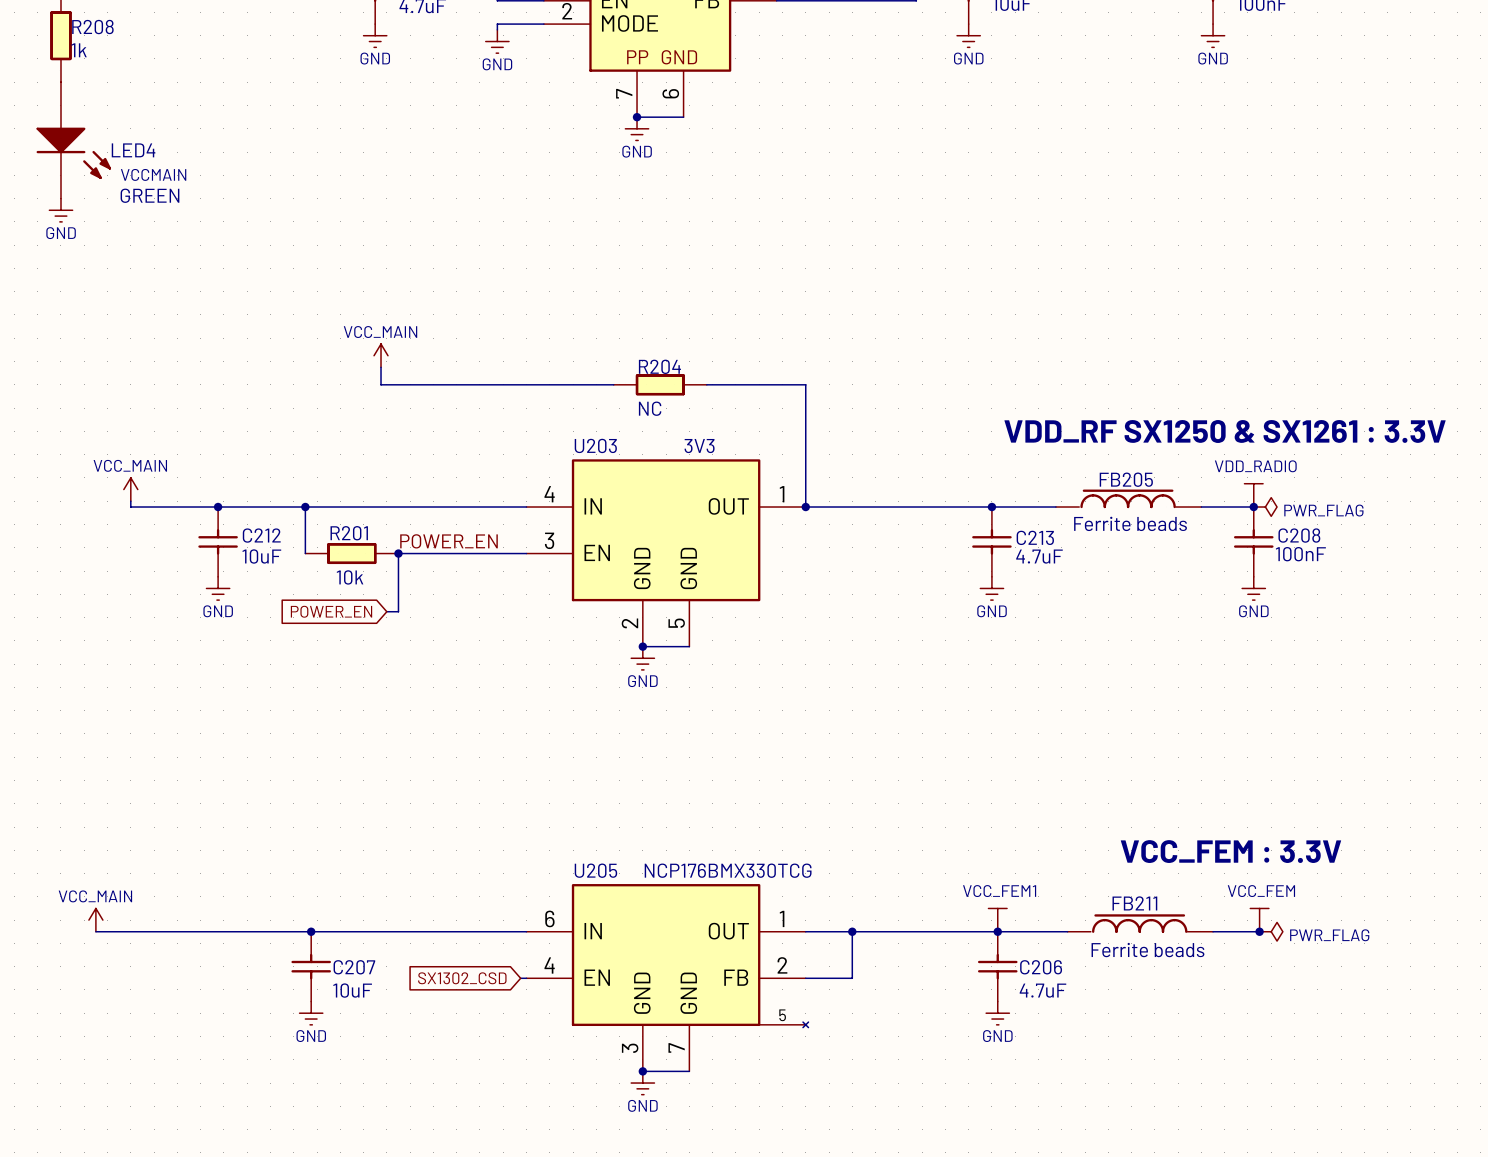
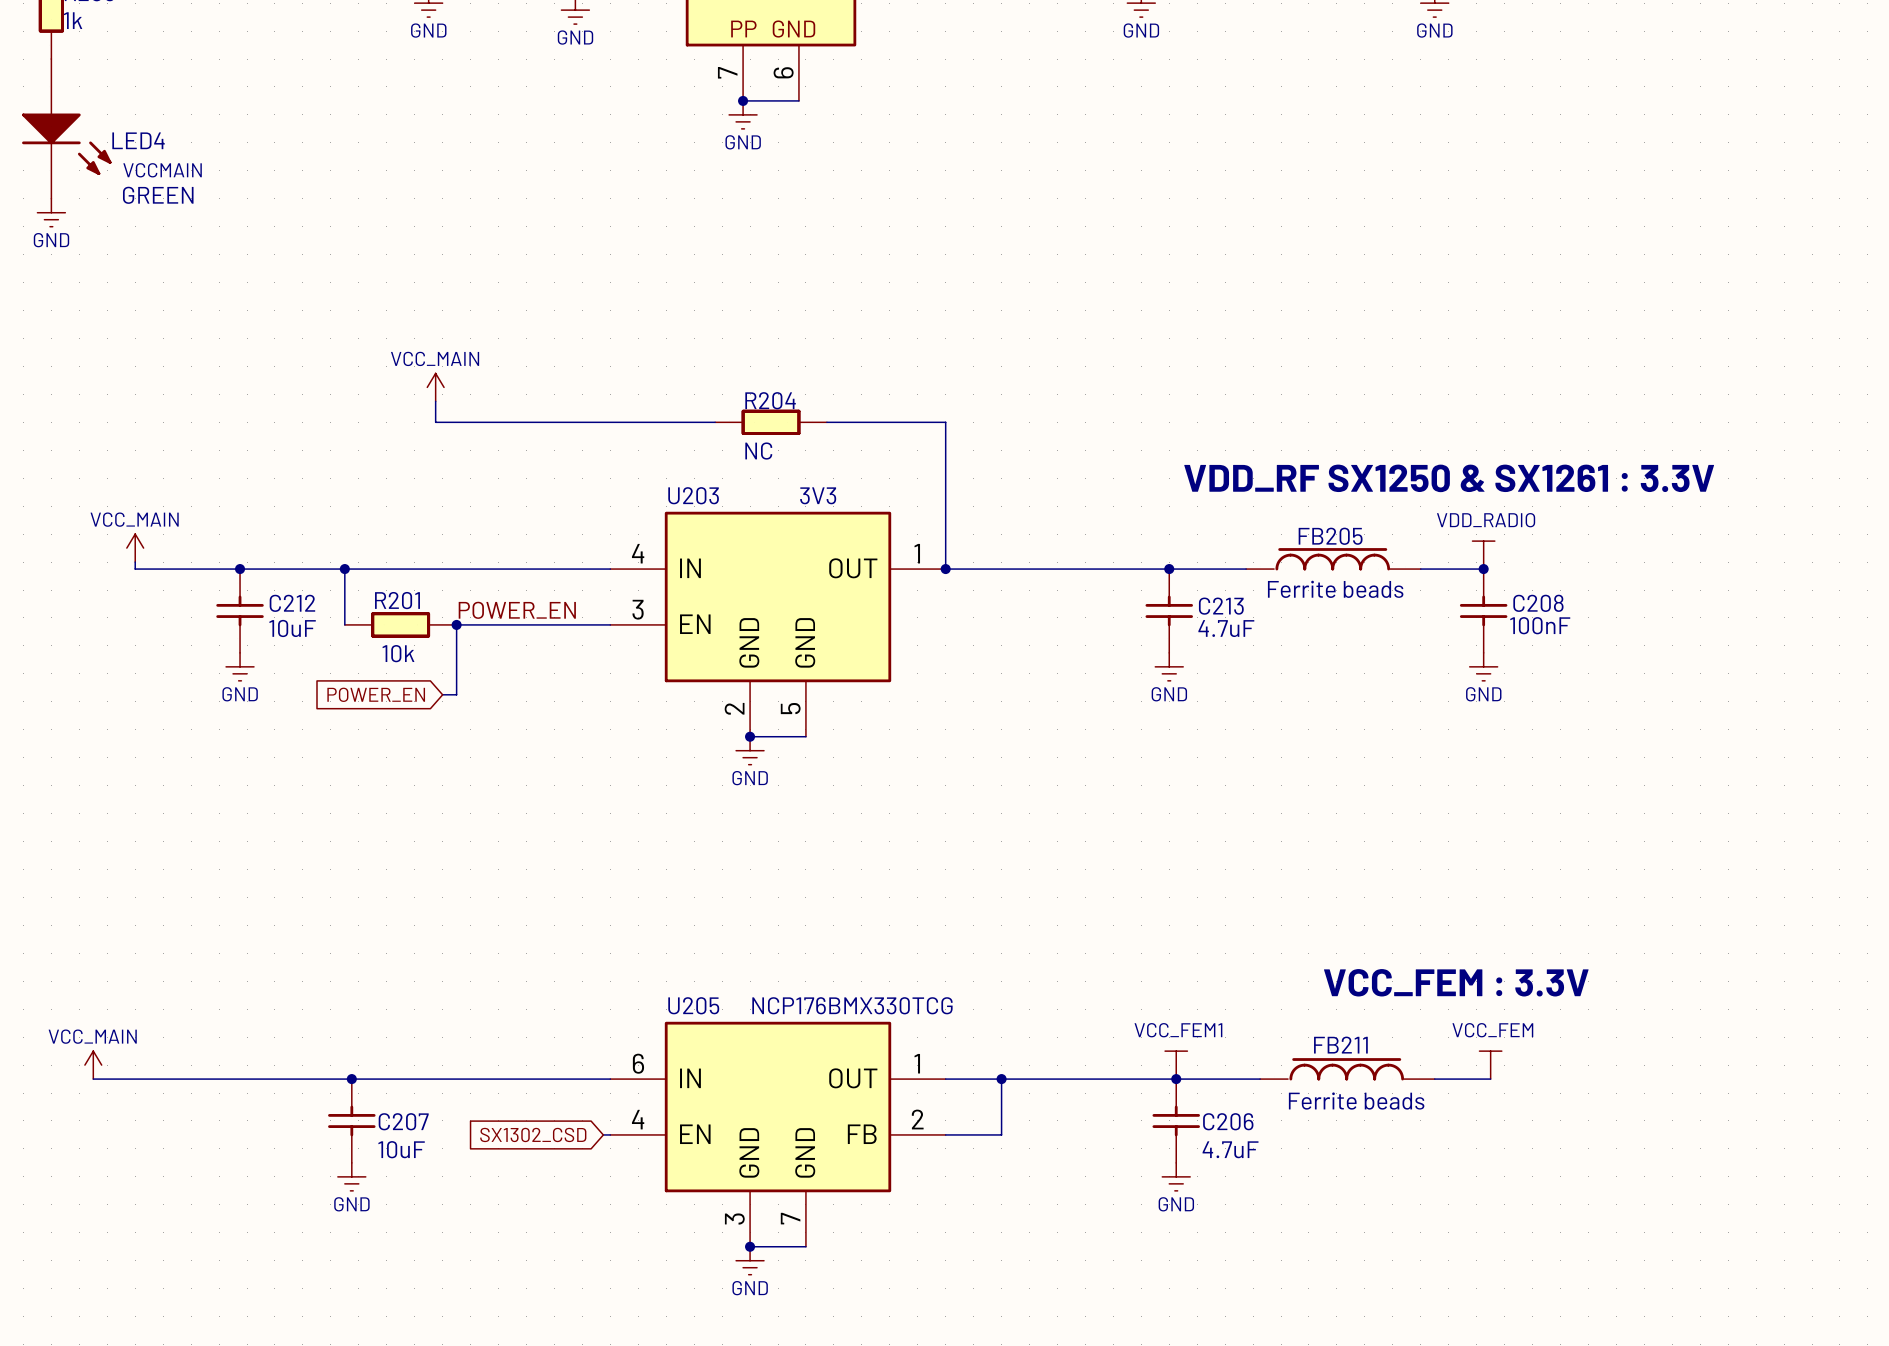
power symbol: PWR_FLAG (1265, 507) -> none
U205 symbol: [526, 884, 809, 1072] -> [610, 1021, 946, 1247]
junction: (1259, 931) -> none
power symbol: PWR_FLAG (1271, 931) -> none

